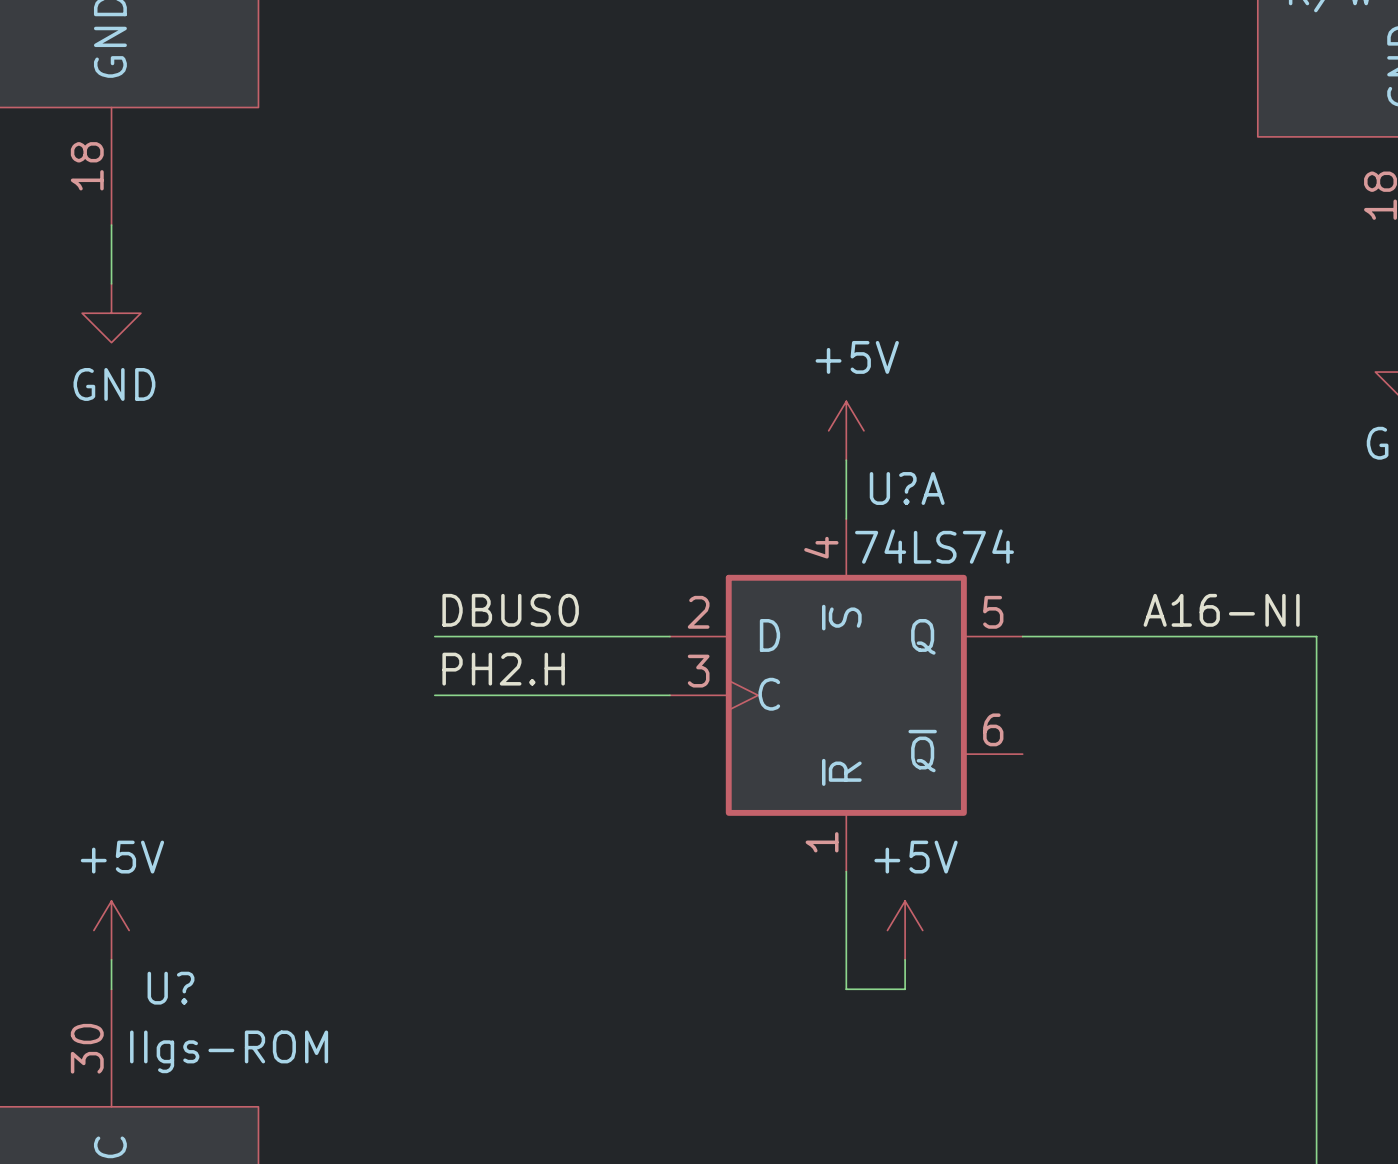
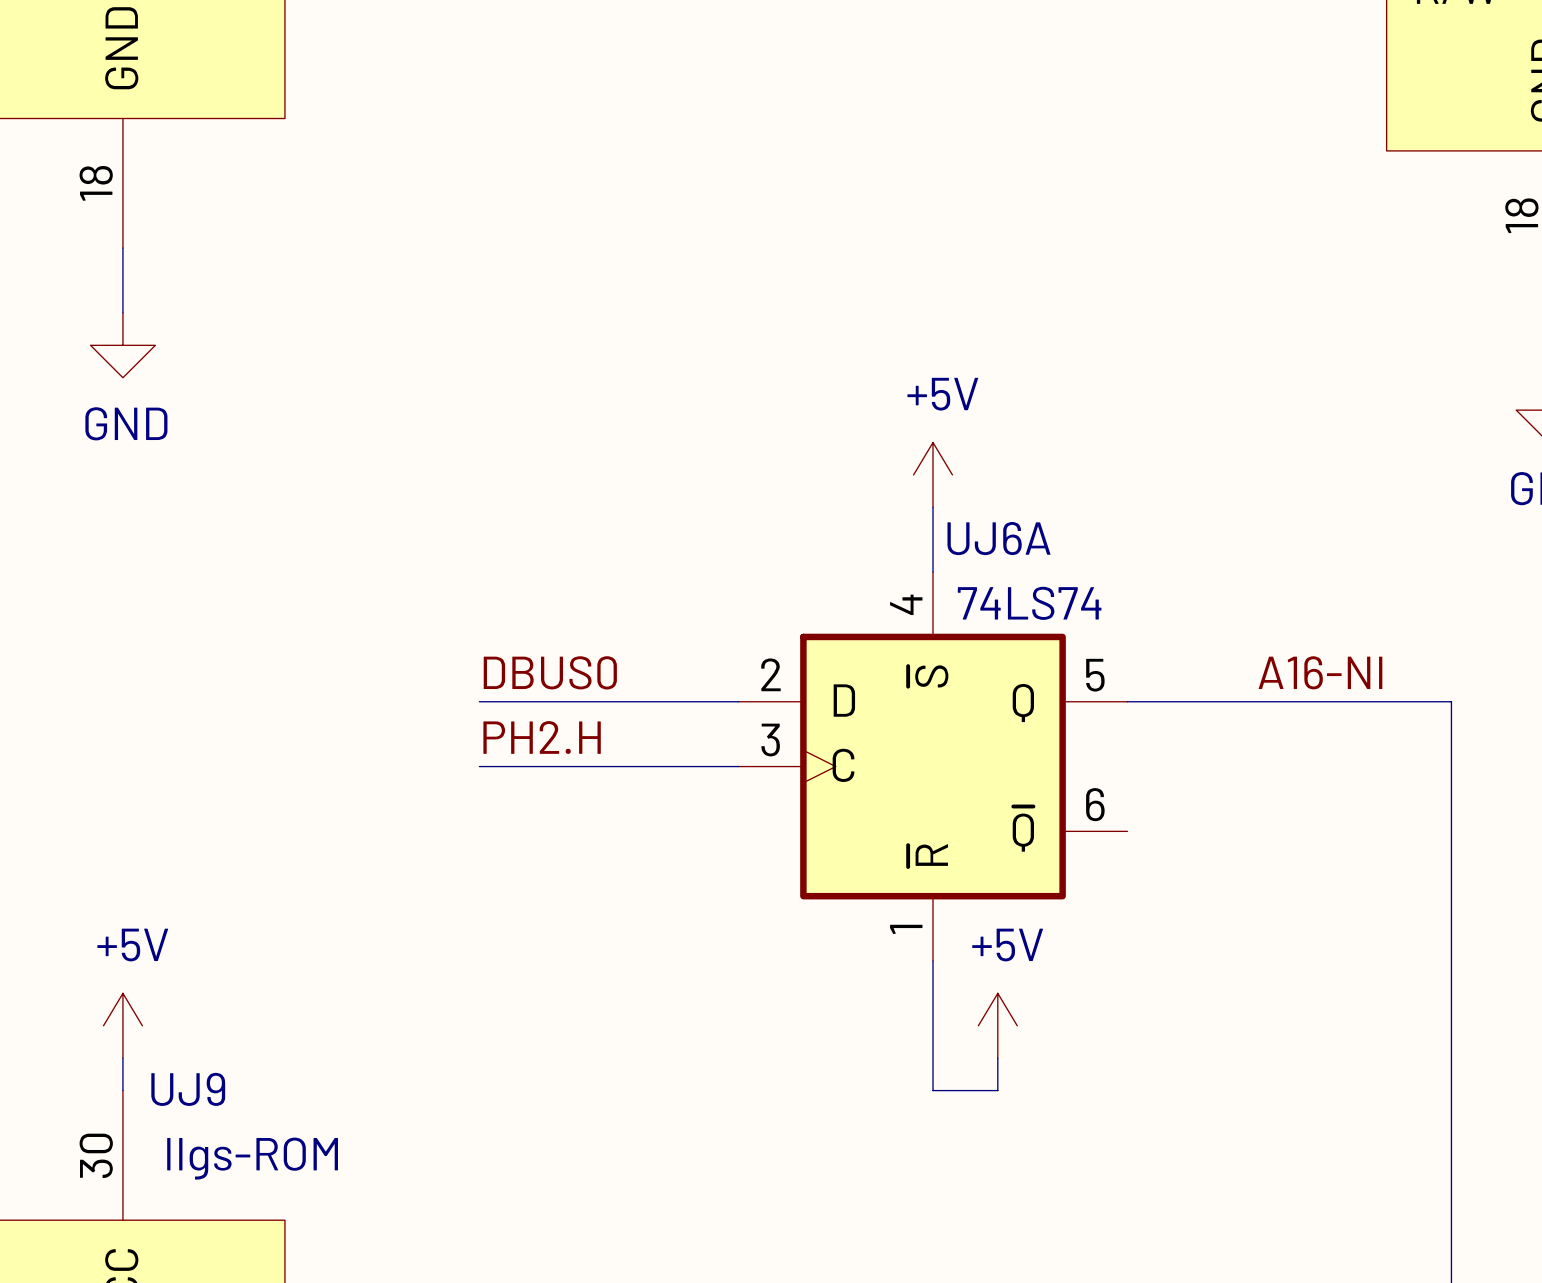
U?A name: U?A (907, 488) -> UJ6A (998, 538)
U? name: U? (171, 988) -> UJ9 (188, 1089)

